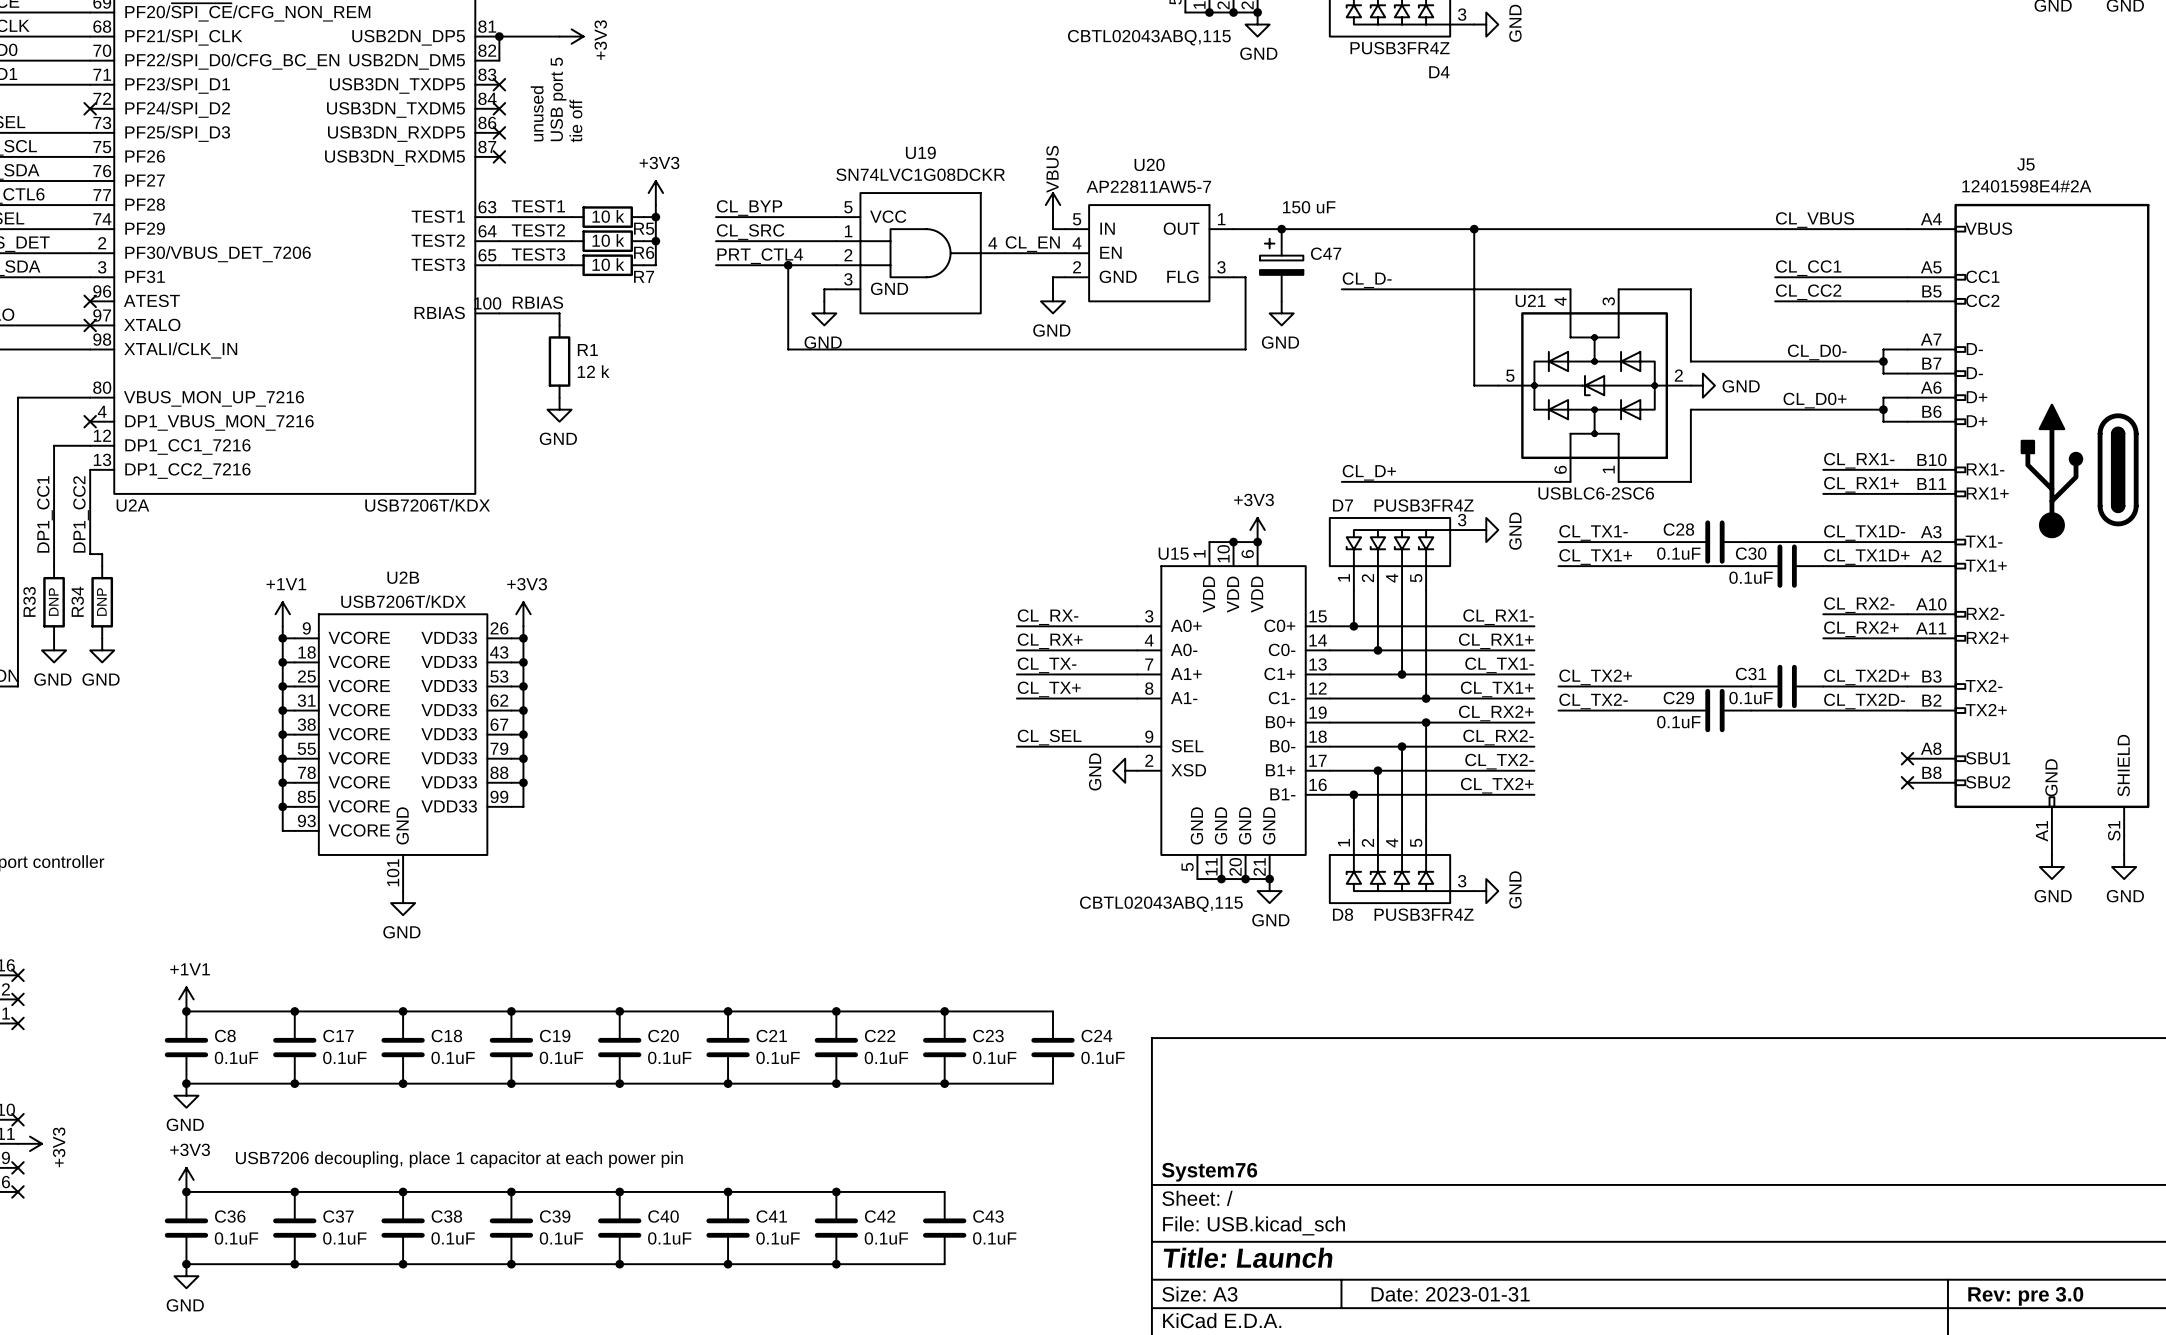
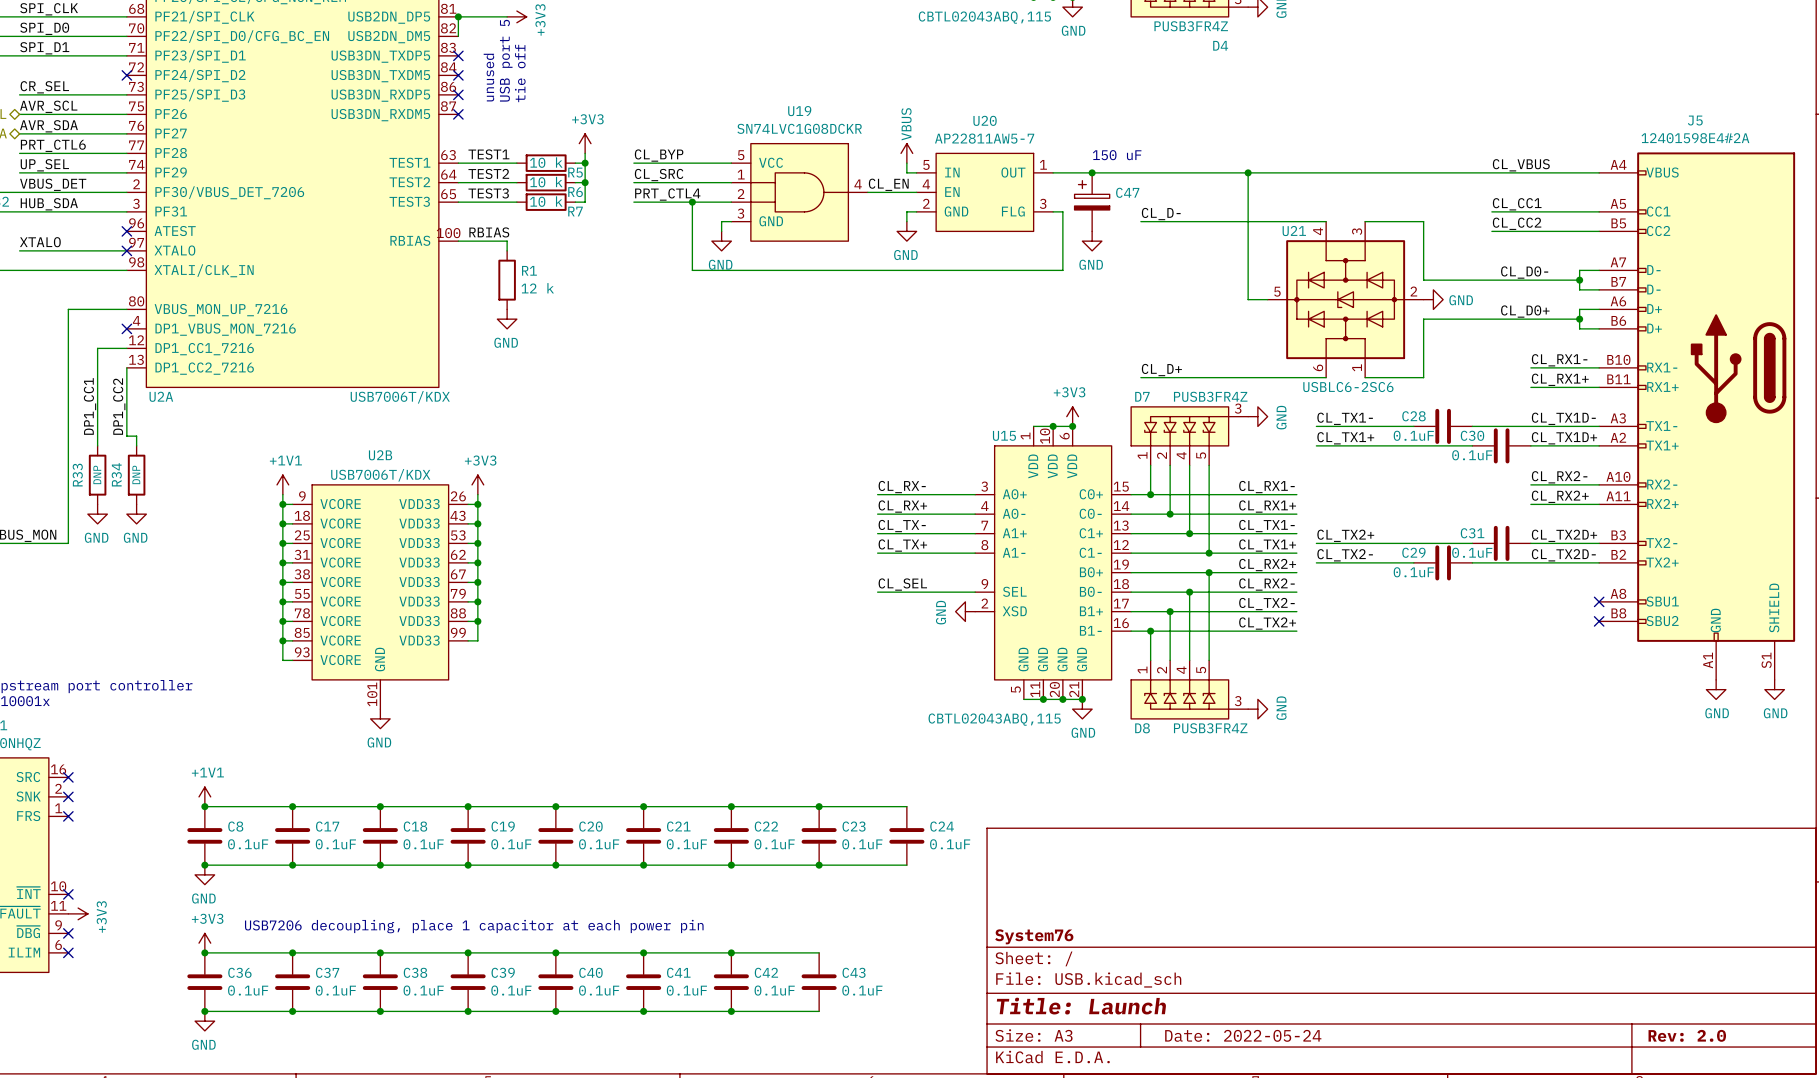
U2A value: USB7206T/KDX (427, 505) -> USB7006T/KDX (400, 397)
U2B value: USB7206T/KDX (403, 601) -> USB7006T/KDX (380, 475)
title block: Date: 2023-01-31 (1450, 1294) -> Date: 2022-05-24 (1243, 1035)
title block: Rev: pre 3.0 (2025, 1296) -> Rev: 2.0 (1687, 1035)

